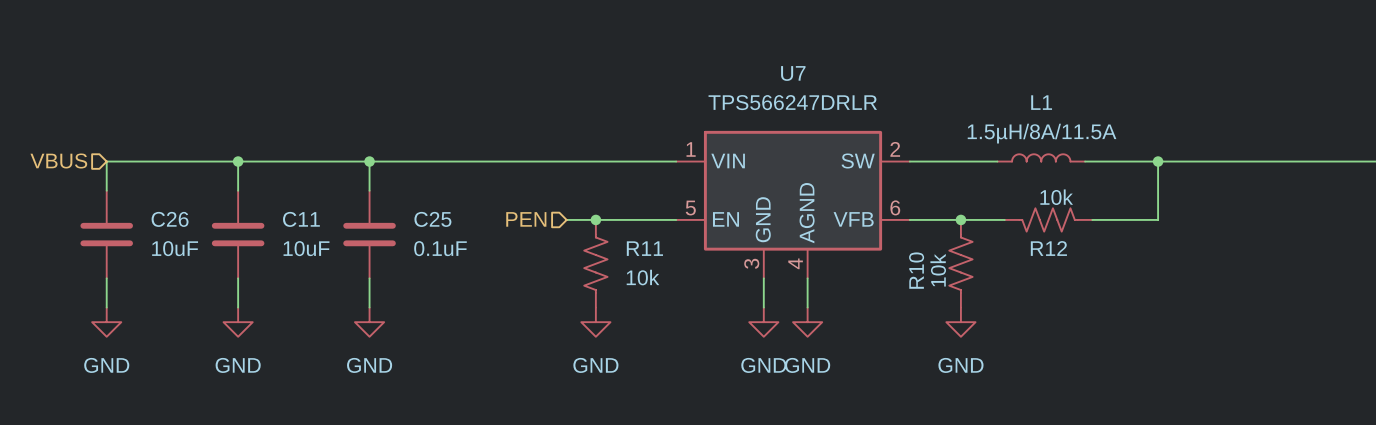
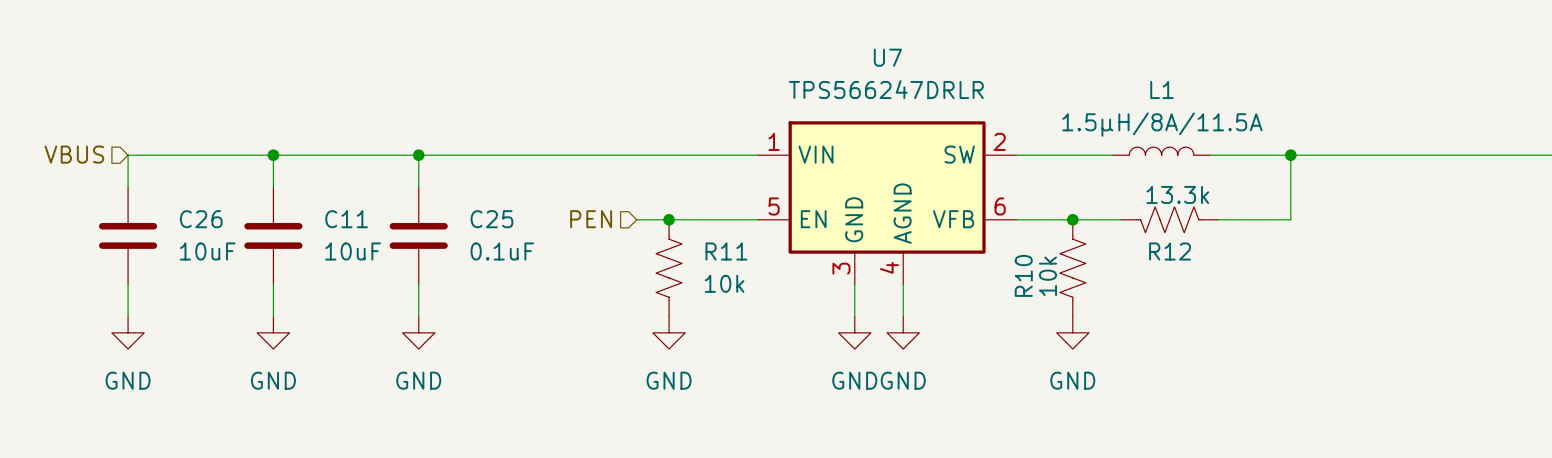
R12 value: 10k (1056, 197) -> 13.3k (1177, 194)

